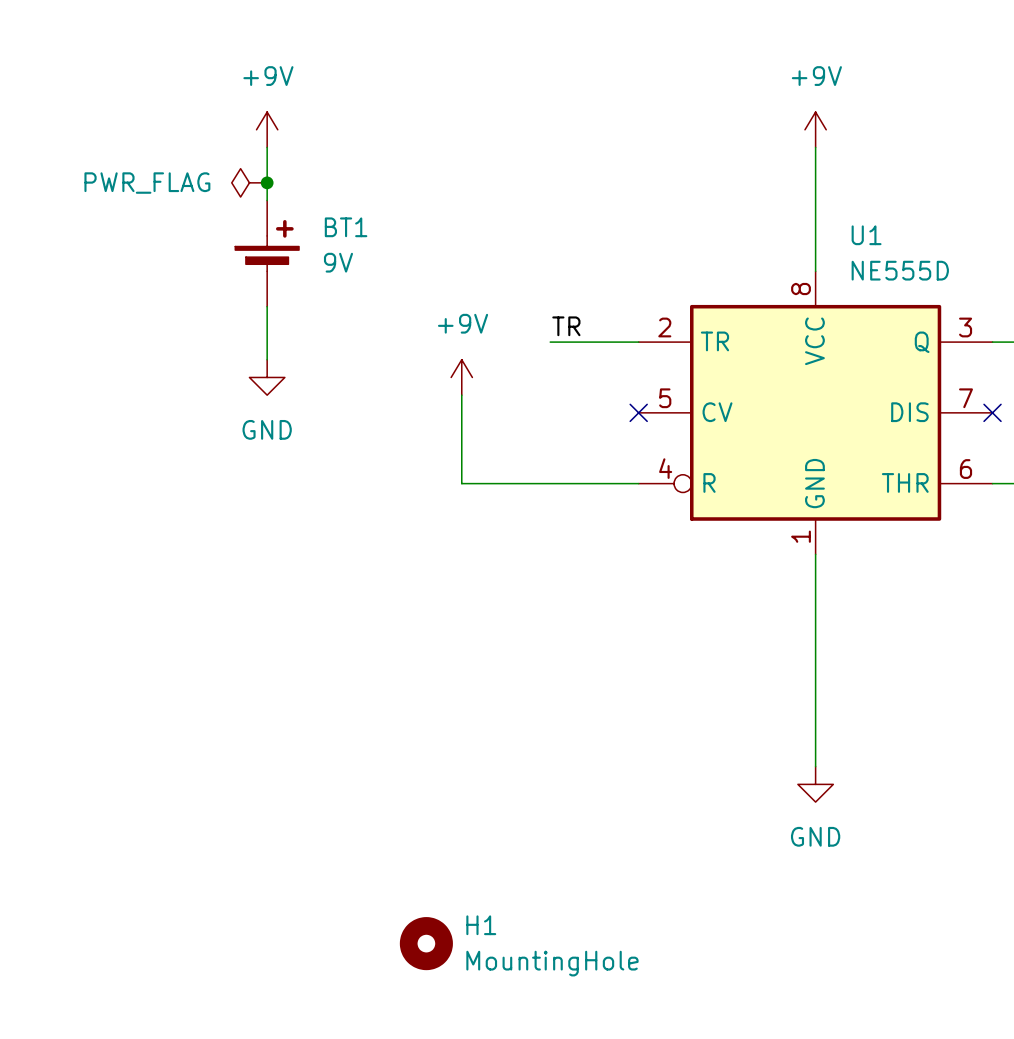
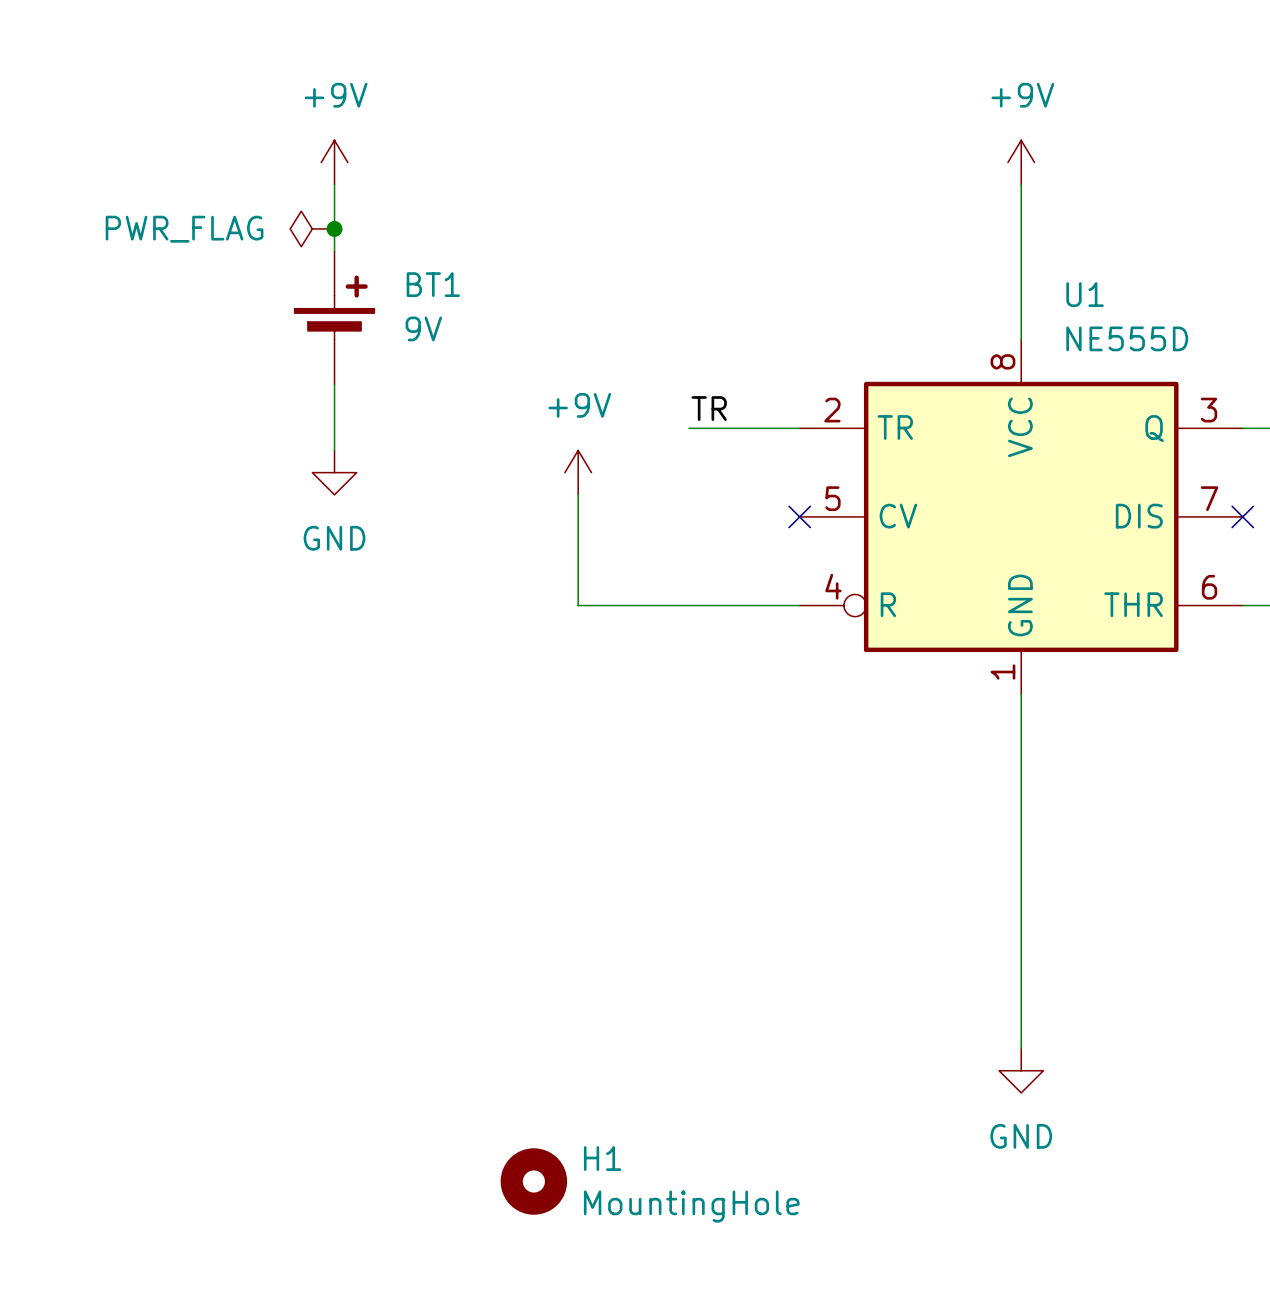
wire: none -> (1021, 959) (1021, 1048)
power symbol position: GND (815, 784) -> GND (1021, 1070)

